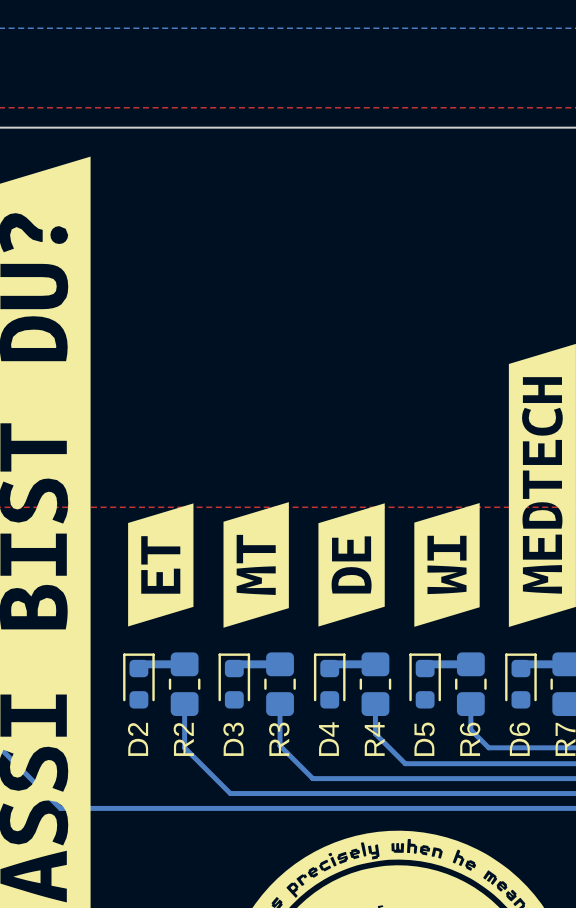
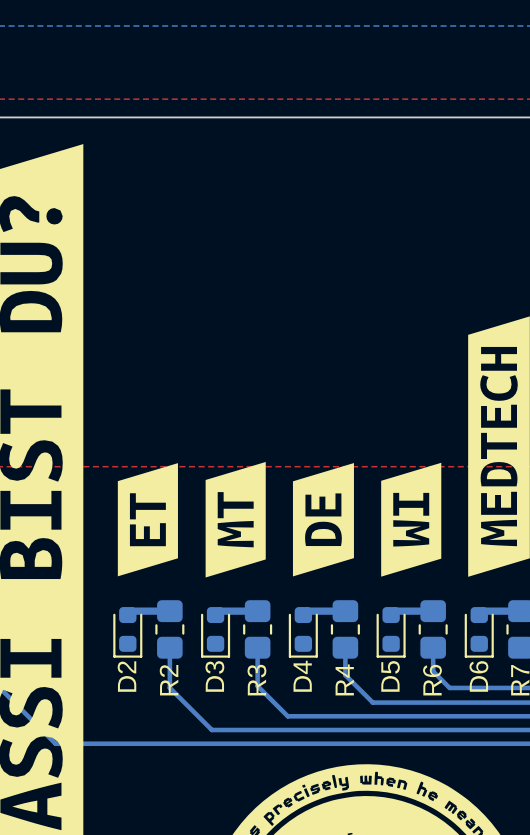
D2 rotation: 0° (138, 681) -> 180° (127, 632)
D3 rotation: 0° (234, 681) -> 180° (215, 632)
D4 rotation: 0° (329, 681) -> 180° (303, 632)
D5 rotation: 0° (425, 681) -> 180° (391, 632)
D6 rotation: 0° (520, 681) -> 180° (479, 632)

